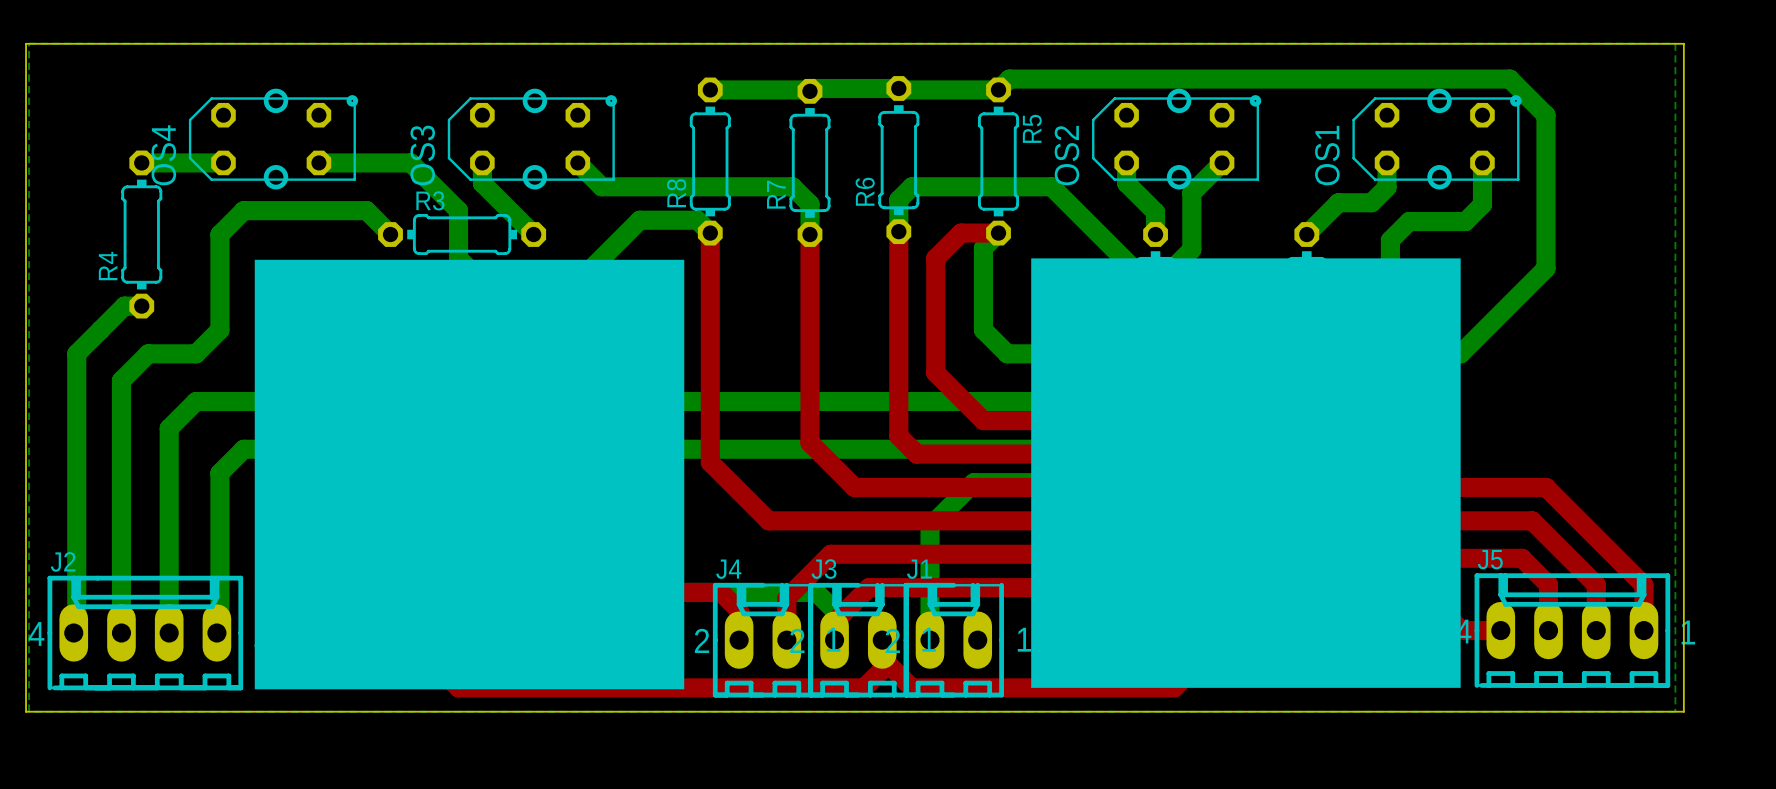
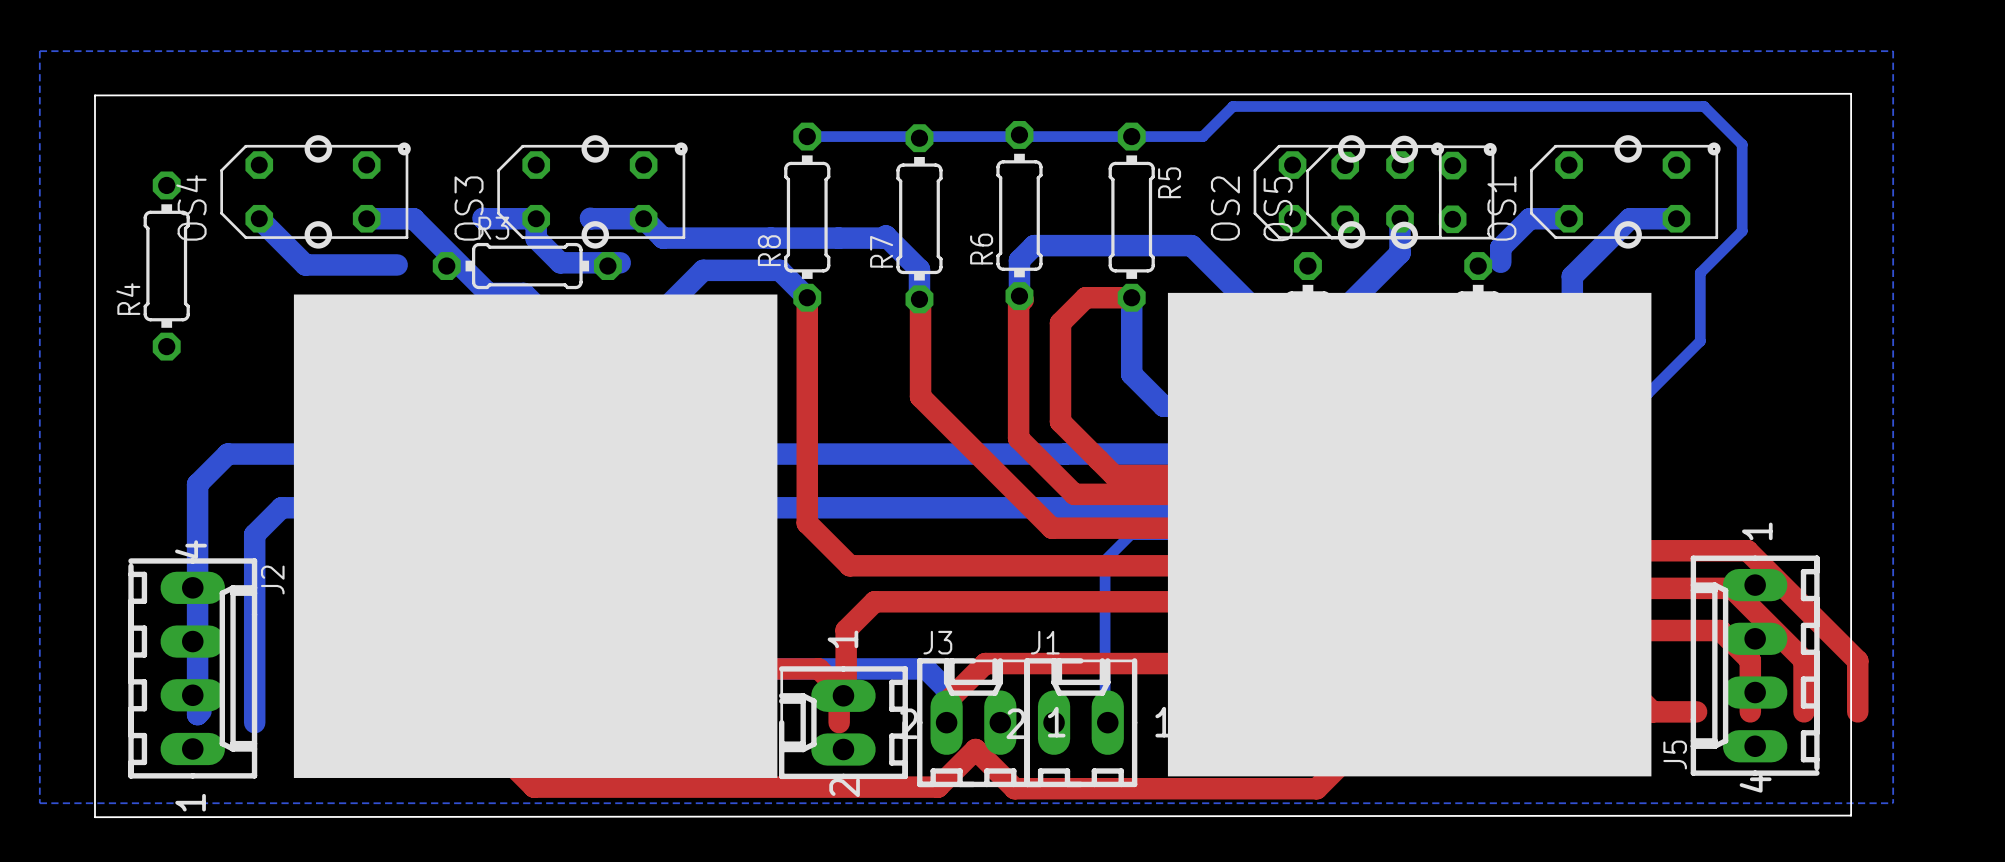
board edge: (26, 43) (1683, 43) (1683, 711) (26, 711) (26, 43) -> (1851, 93) (94, 95) (94, 817) (1851, 815) (1851, 93)
bottom track: (710, 89) (998, 89) (1009, 79) (1509, 79) (1545, 115) (1545, 268) (1460, 353) (1412, 353) (1352, 413) (1290, 413) (1269, 434) (1196, 434) (1149, 482) (973, 482) (930, 526) (930, 640) -> none
bottom track: none -> (807, 136) (1202, 136) (1232, 106) (1704, 106) (1742, 144) (1742, 231) (1700, 273) (1700, 341) (1647, 393) (1568, 393) (1545, 417) (1545, 441) (1526, 459) (1452, 459) (1431, 480) (1356, 480) (1303, 534) (1130, 534) (1105, 560) (1105, 695)
OS4 position: (273, 139) -> (315, 191)
OS3 position: (532, 139) -> (592, 191)
OS2 position: (1176, 139) -> (1348, 191)
OS1 position: (1437, 139) -> (1625, 191)
R6 position: (898, 160) -> (1019, 215)
R8 position: (710, 161) -> (807, 217)
R5 position: (998, 161) -> (1131, 217)
bottom track: (141, 162) (223, 162) -> none
bottom track: (318, 162) (410, 162) (458, 210) (459, 258) -> (366, 218) (413, 218) (488, 293) (523, 293)
bottom track: (482, 162) (482, 183) (533, 234) -> none
bottom track: (577, 162) (601, 186) (792, 186) (809, 204) (809, 234) -> none
R7 position: (809, 162) -> (919, 218)
bottom track: (1126, 162) (1126, 183) (1155, 212) (1155, 234) -> none
bottom track: (1222, 162) (1191, 193) (1191, 249) (1170, 270) -> (1401, 217) (1400, 253) (1346, 306) (1324, 306)
bottom track: (1387, 162) (1387, 187) (1371, 202) (1338, 202) (1306, 234) -> none
bottom track: (1482, 162) (1482, 204) (1465, 221) (1409, 221) (1390, 240) (1390, 243) -> (1676, 218) (1629, 218) (1572, 276)
OS5: none -> (1401, 192)
bottom track: none -> (259, 218) (305, 264) (397, 264)
bottom track: none -> (483, 218) (536, 218) (536, 238) (560, 262) (620, 262)
bottom track: none -> (590, 218) (643, 218) (662, 238) (883, 238) (885, 235) (919, 269) (919, 299)
bottom track: none -> (1569, 218) (1529, 218) (1500, 247) (1500, 262)
bottom track: (898, 231) (898, 199) (911, 186) (1051, 186) (1135, 270) -> (1019, 296) (1019, 260) (1034, 245) (1191, 245) (1252, 306) (1285, 306)
top track: (898, 231) (898, 436) (916, 454) (1273, 454) -> (1023, 299) (1018, 296) (1018, 438) (1074, 494) (1421, 494) (1440, 513)
bottom track: (710, 233) (697, 220) (639, 220) (577, 282) (482, 282) -> (807, 297) (779, 270) (703, 270) (646, 326) (557, 326) (550, 319)
top track: (710, 233) (710, 462) -> (807, 297) (807, 523)
bottom track: (998, 233) (983, 248) (983, 329) (1007, 353) (1102, 353) -> (1131, 297) (1131, 374) (1163, 406) (1242, 406) (1248, 400)
top track: (998, 233) (961, 233) (935, 258) (935, 285) -> (1131, 297) (1085, 297) (1060, 322)
bottom track: (390, 234) (366, 210) (243, 210) (219, 234) (219, 329) (196, 353) (148, 353) (121, 380) (121, 633) (124, 629) -> none
top track: (809, 234) (809, 442) (854, 487) (1259, 487) -> (919, 299) (920, 396) (1051, 528) (1402, 528) (1424, 550)
bottom track: (141, 306) (124, 306) (76, 353) (76, 629) (73, 633) -> none
top track: (748, 500) (768, 520) (1245, 520) -> (849, 565) (1386, 565) (1409, 588)
top track: (1231, 554) (830, 554) (786, 598) (786, 640) -> (1393, 625) (1368, 601) (874, 601) (846, 630) (846, 693) (843, 695) (847, 695)
J2 name position: J2 (63, 561) -> J2 (272, 580)
J2 footprint: [47, 575, 244, 691] -> [128, 558, 258, 779]
J5 rotation: 0° (1572, 630) -> 90° counterclockwise (1755, 665)
J4 rotation: 0° (762, 640) -> 90° counterclockwise (843, 722)
top track: (458, 687) (864, 687) (888, 664) (911, 687) (1174, 687) -> (523, 776) (534, 787) (938, 787) (975, 749) (1014, 788) (1316, 788) (1329, 776)

